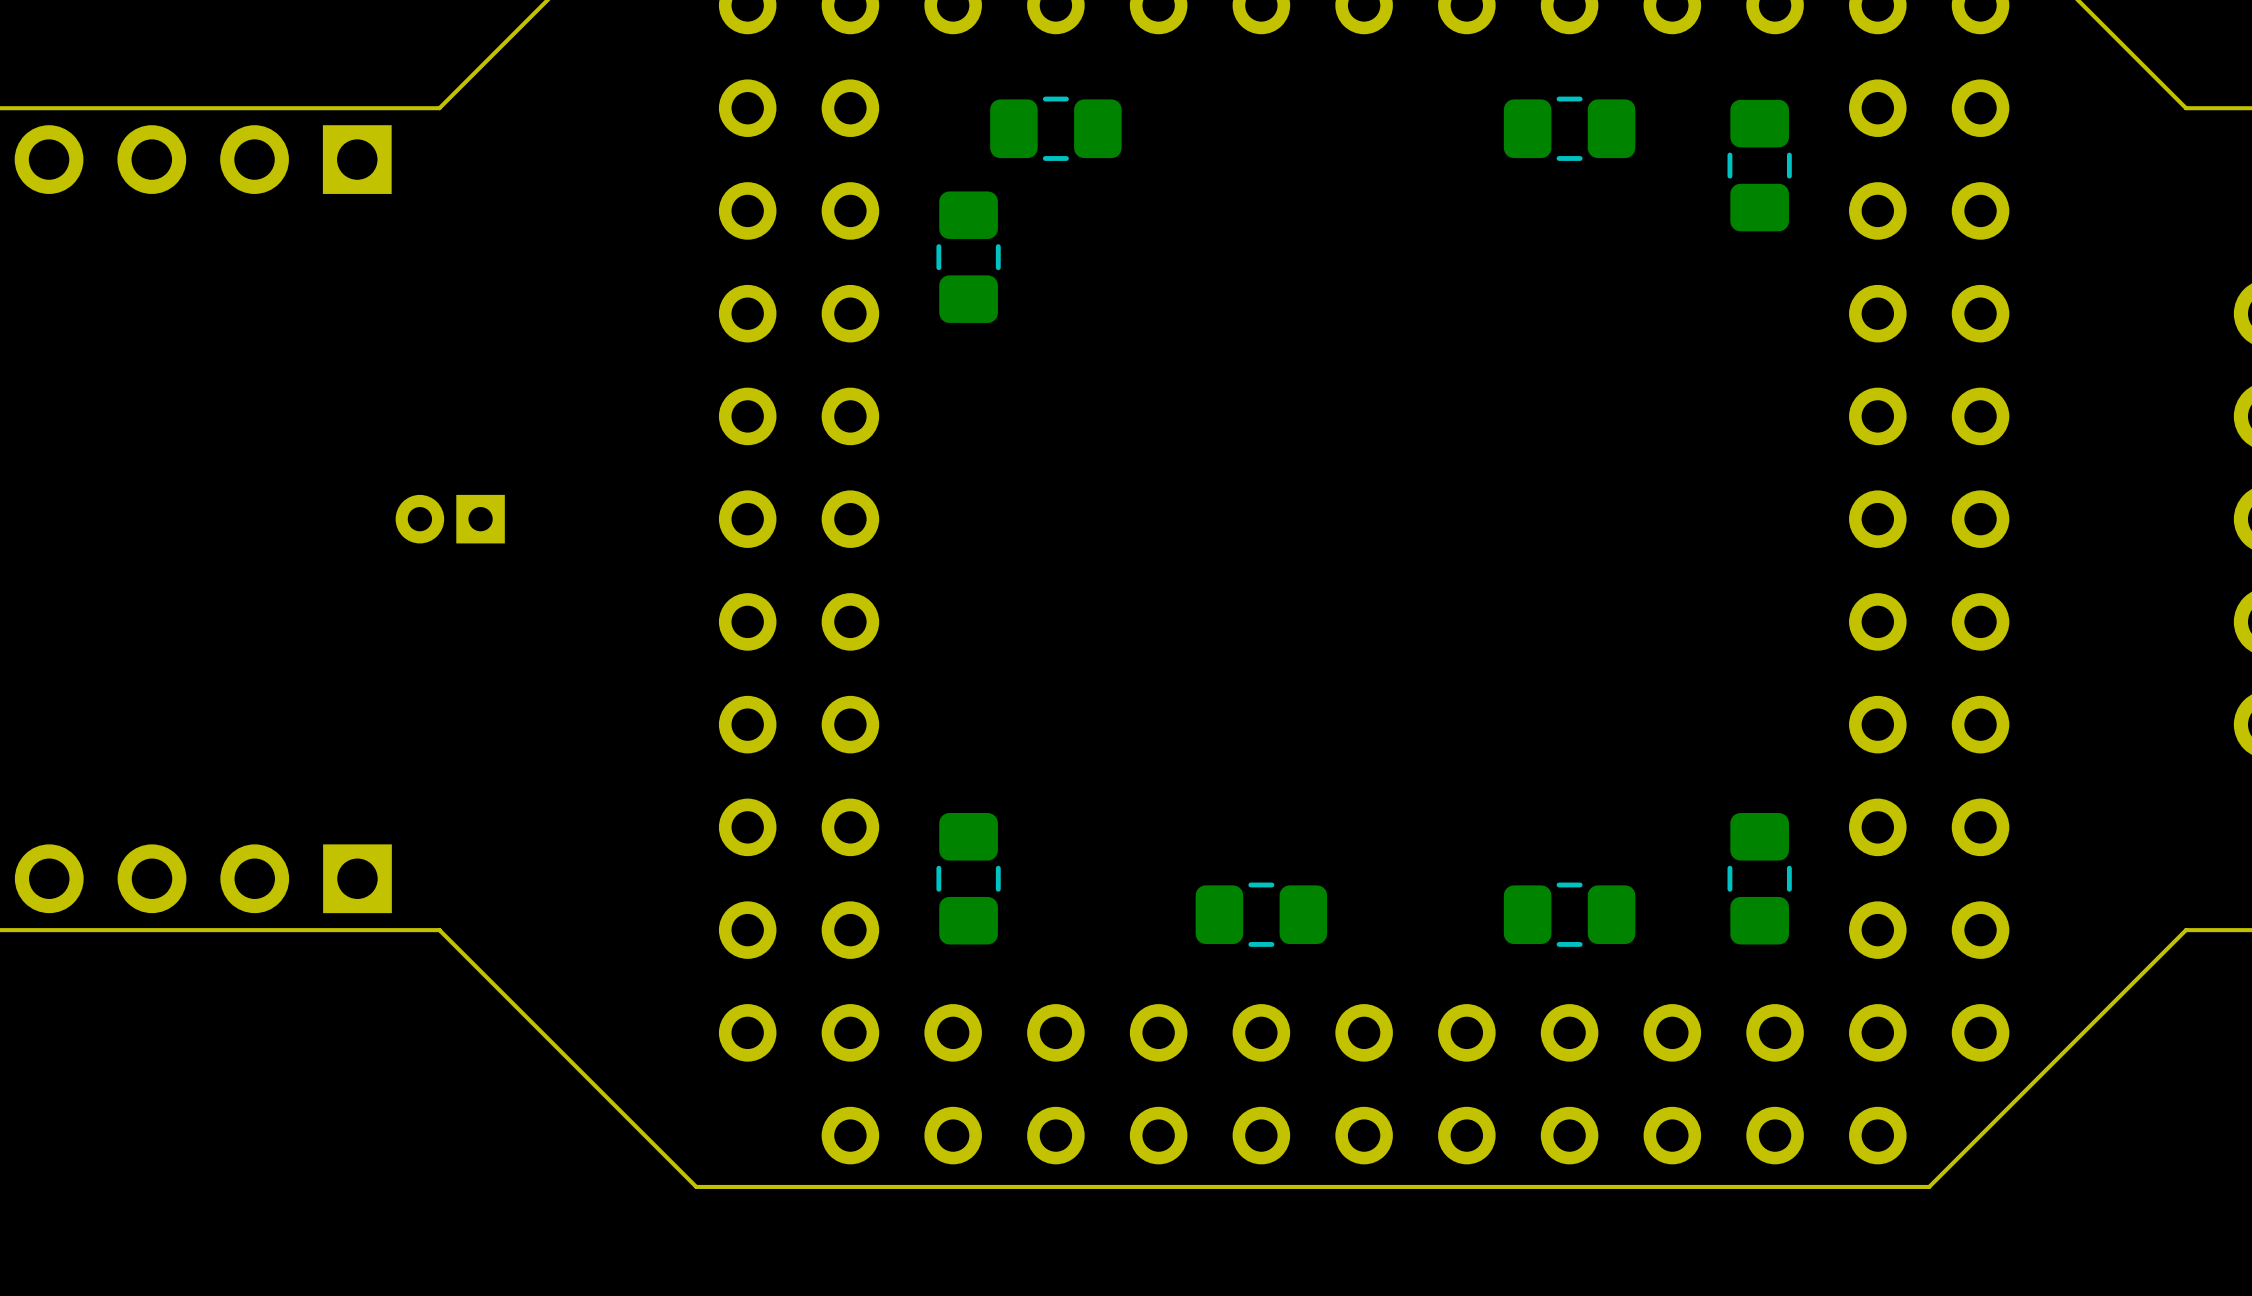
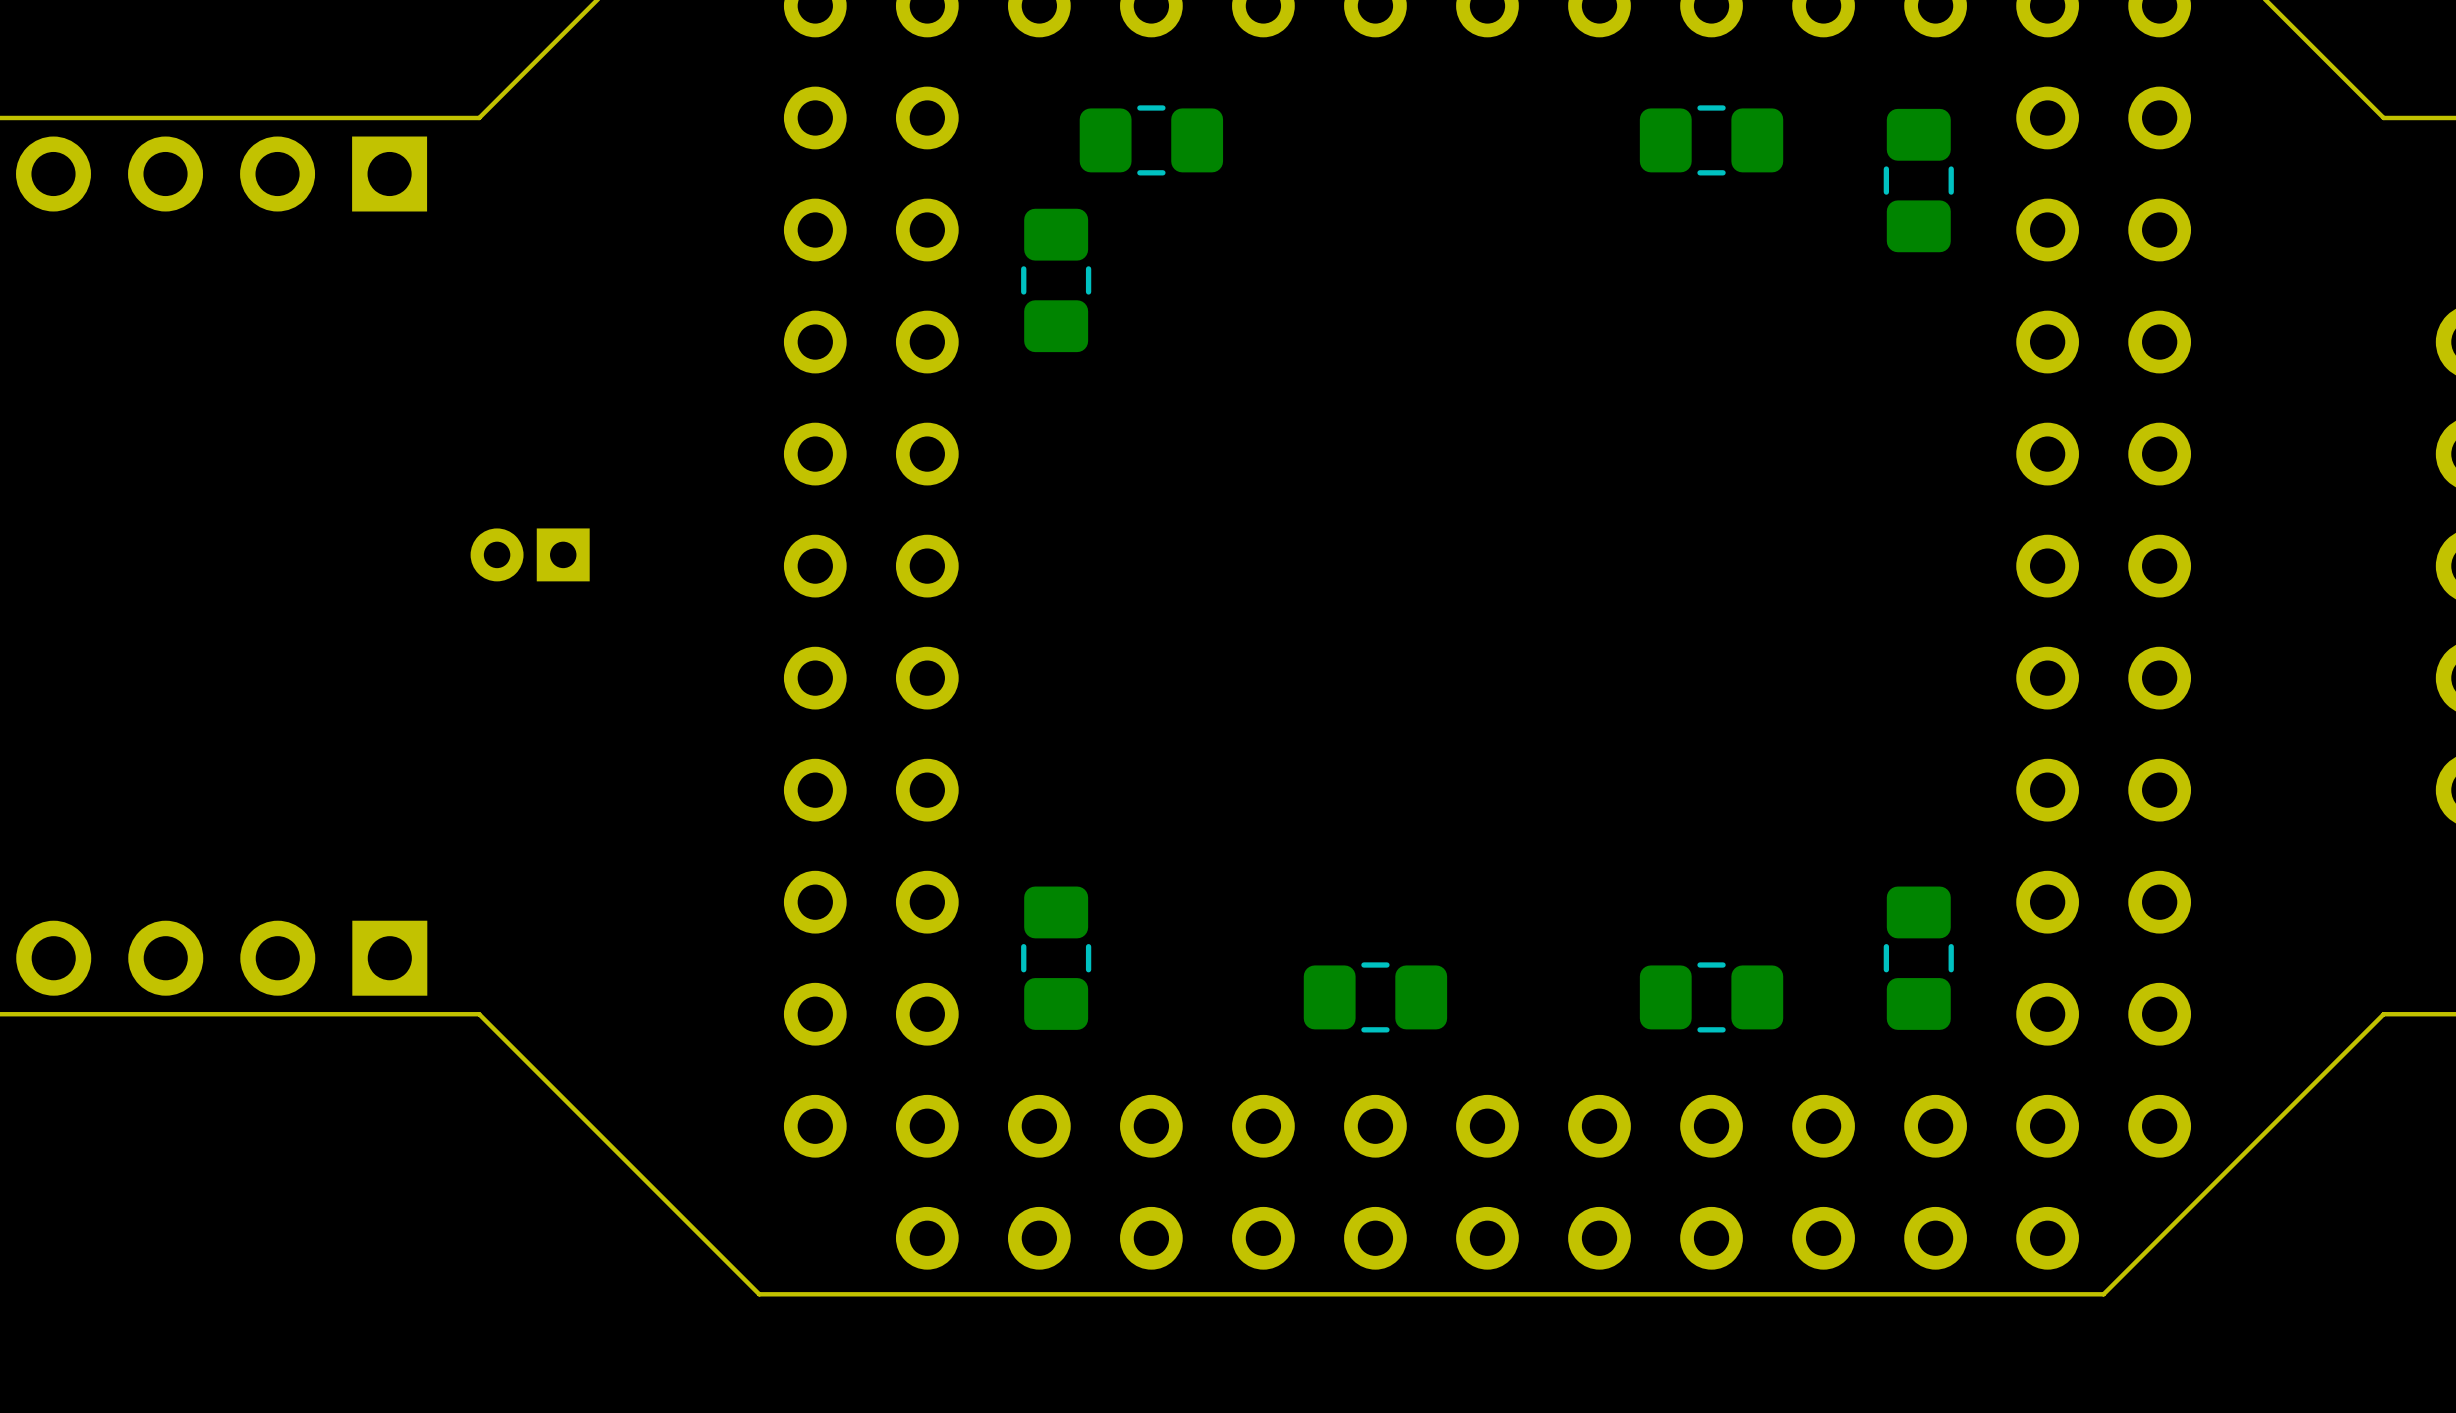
part position: (450, 519) -> (530, 554)

